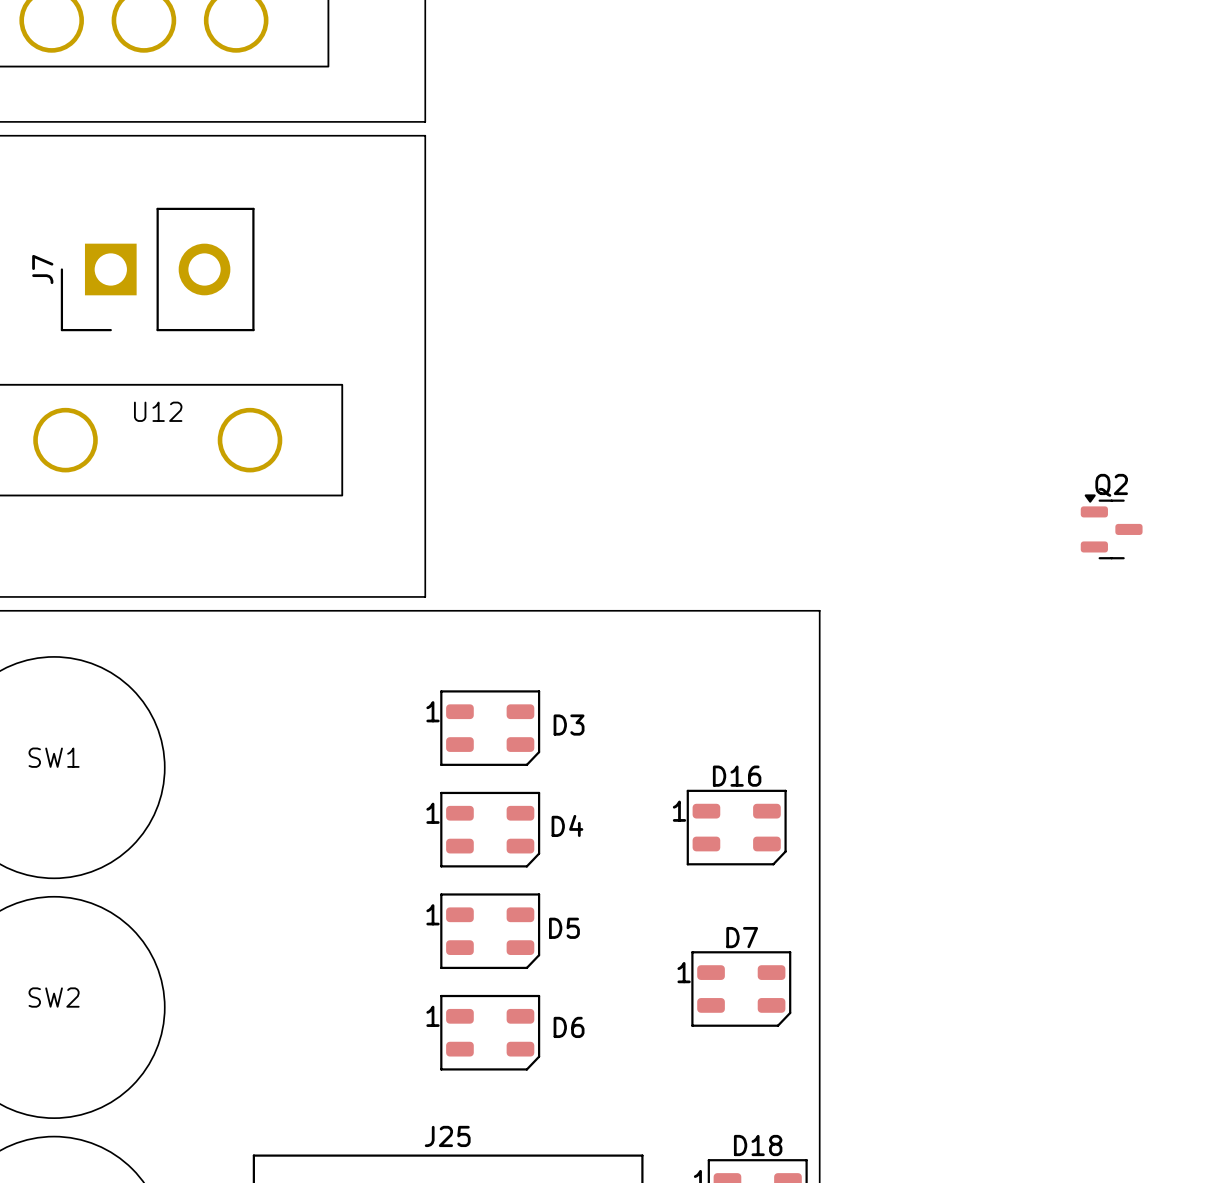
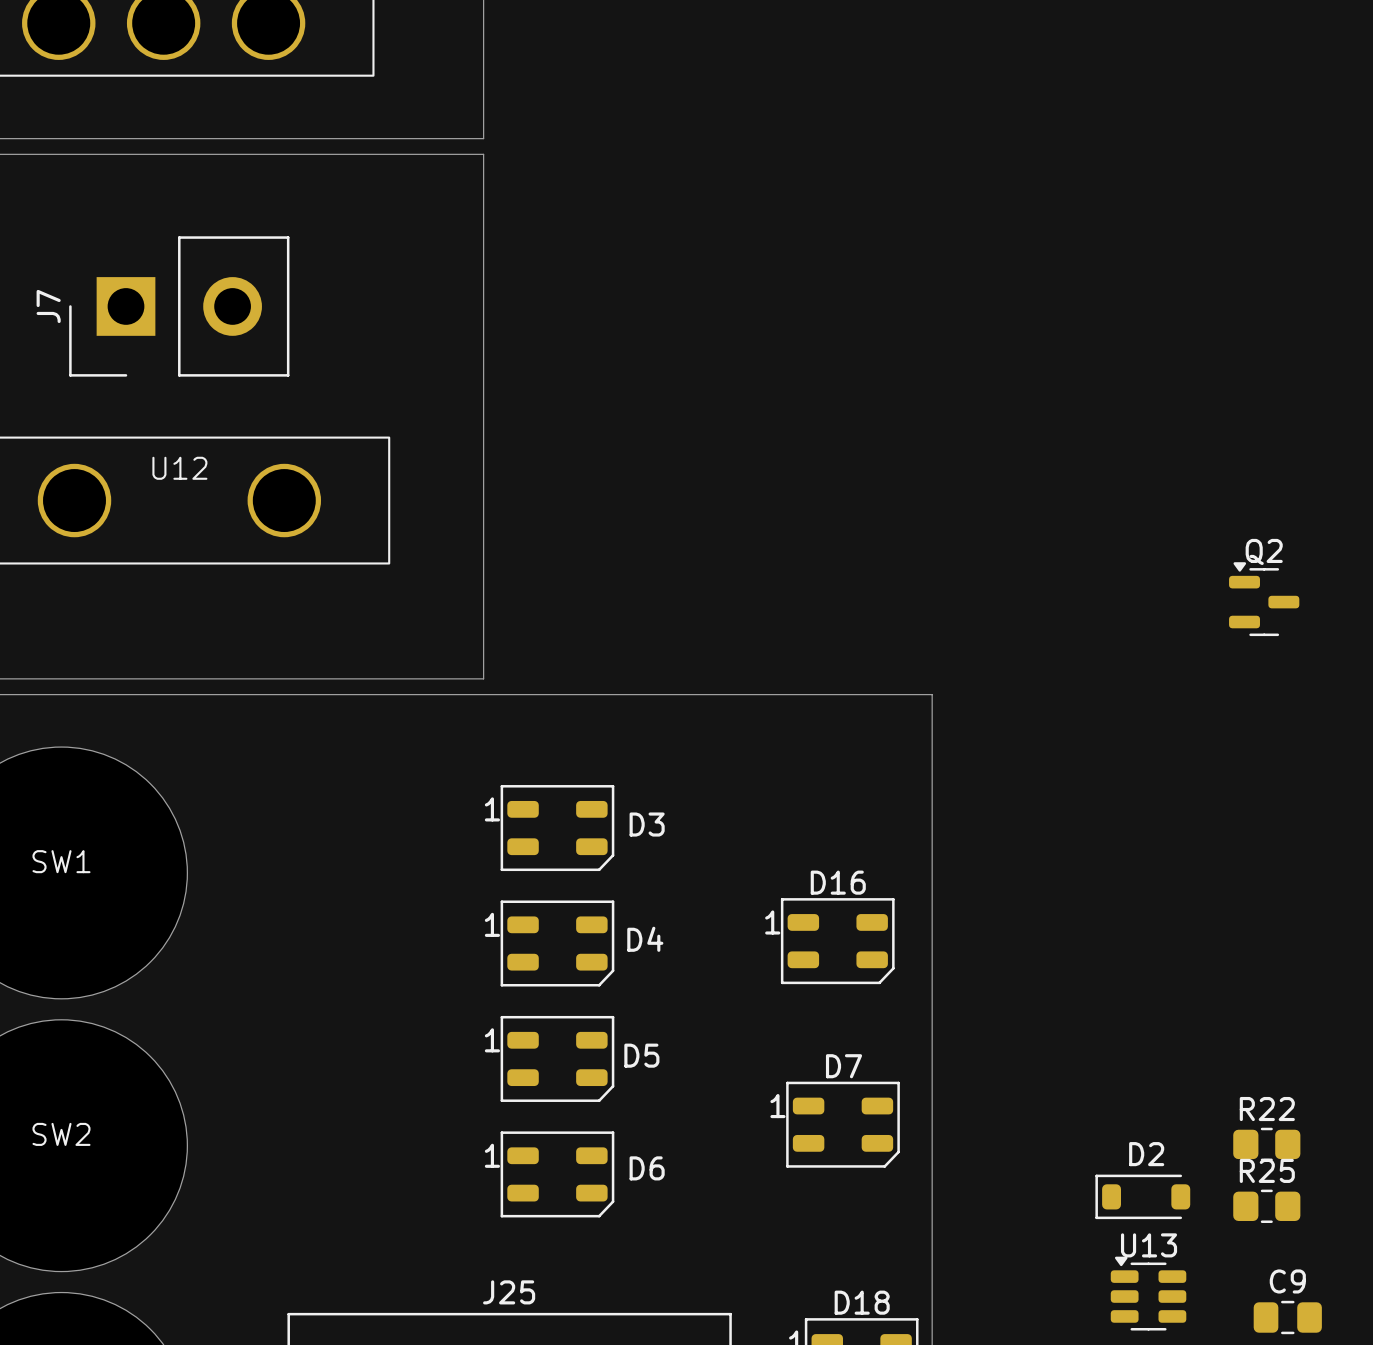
R22: none -> (1266, 1144)
D2: none -> (1142, 1196)
R25: none -> (1266, 1206)
U13: none -> (1148, 1293)
C9: none -> (1287, 1317)

